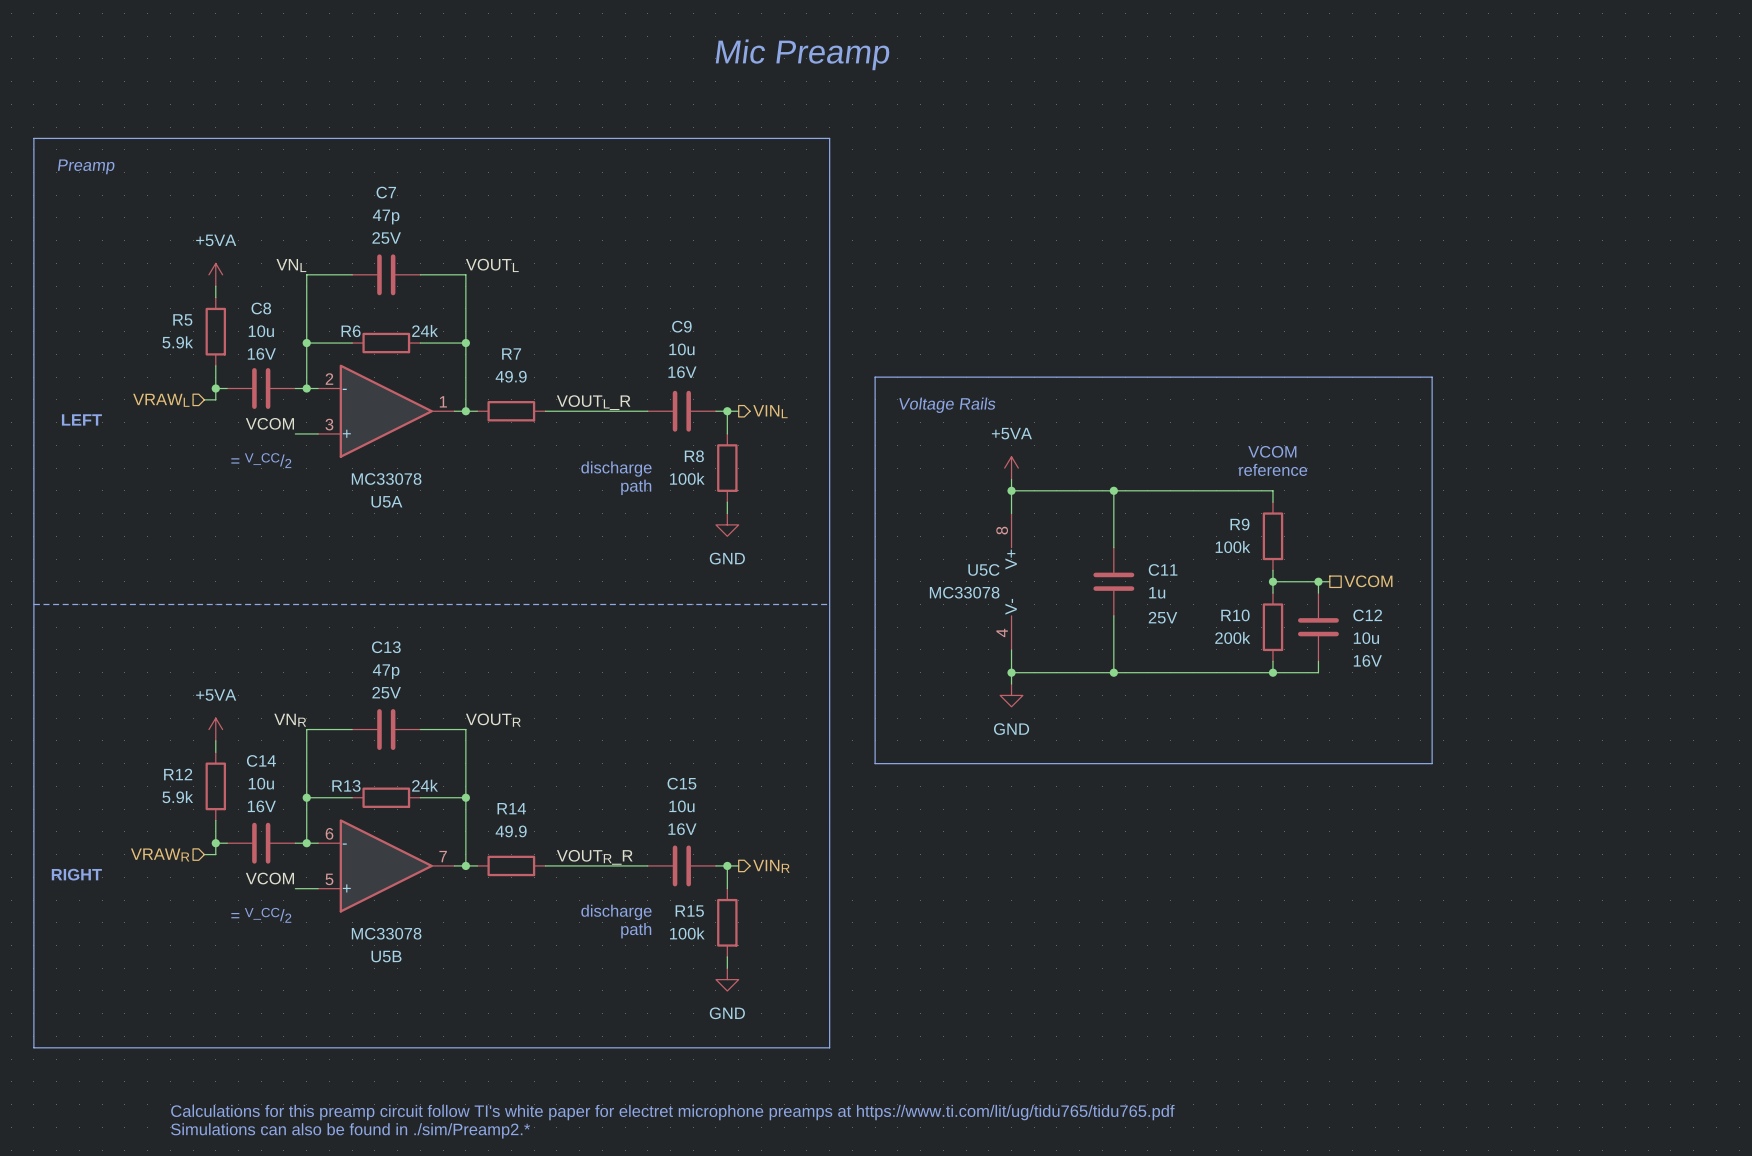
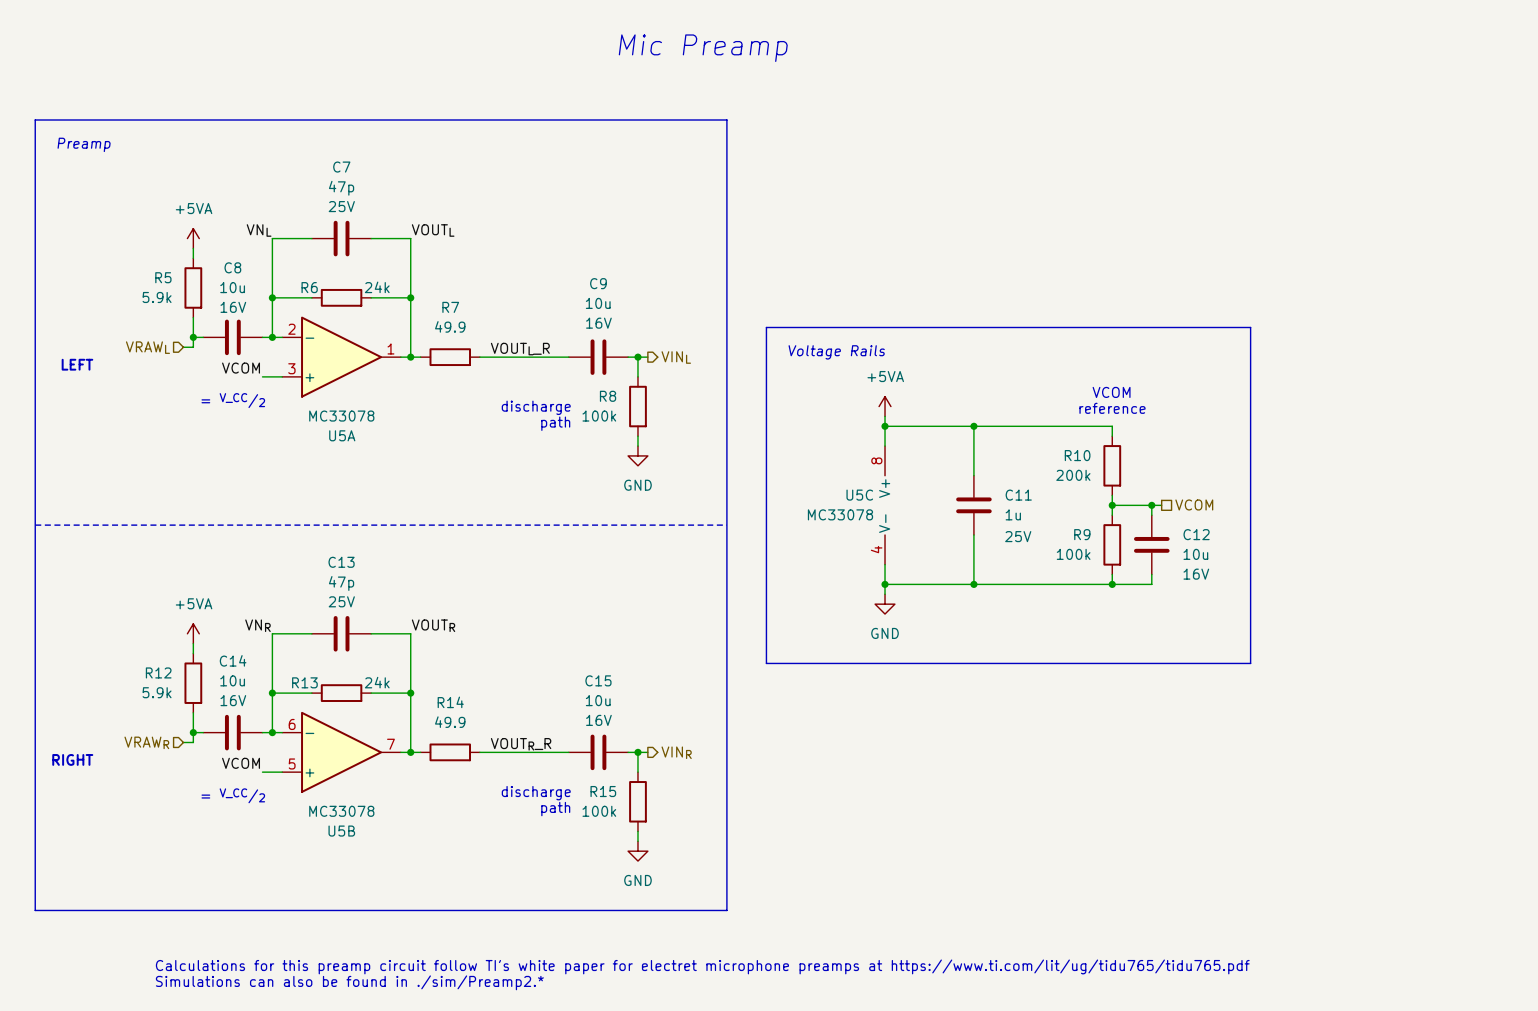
R9 name: R9 (1239, 524) -> R10 (1077, 455)
R9 value: 100k (1232, 547) -> 200k (1073, 475)
R10 name: R10 (1235, 615) -> R9 (1082, 534)
R10 value: 200k (1232, 637) -> 100k (1073, 554)

